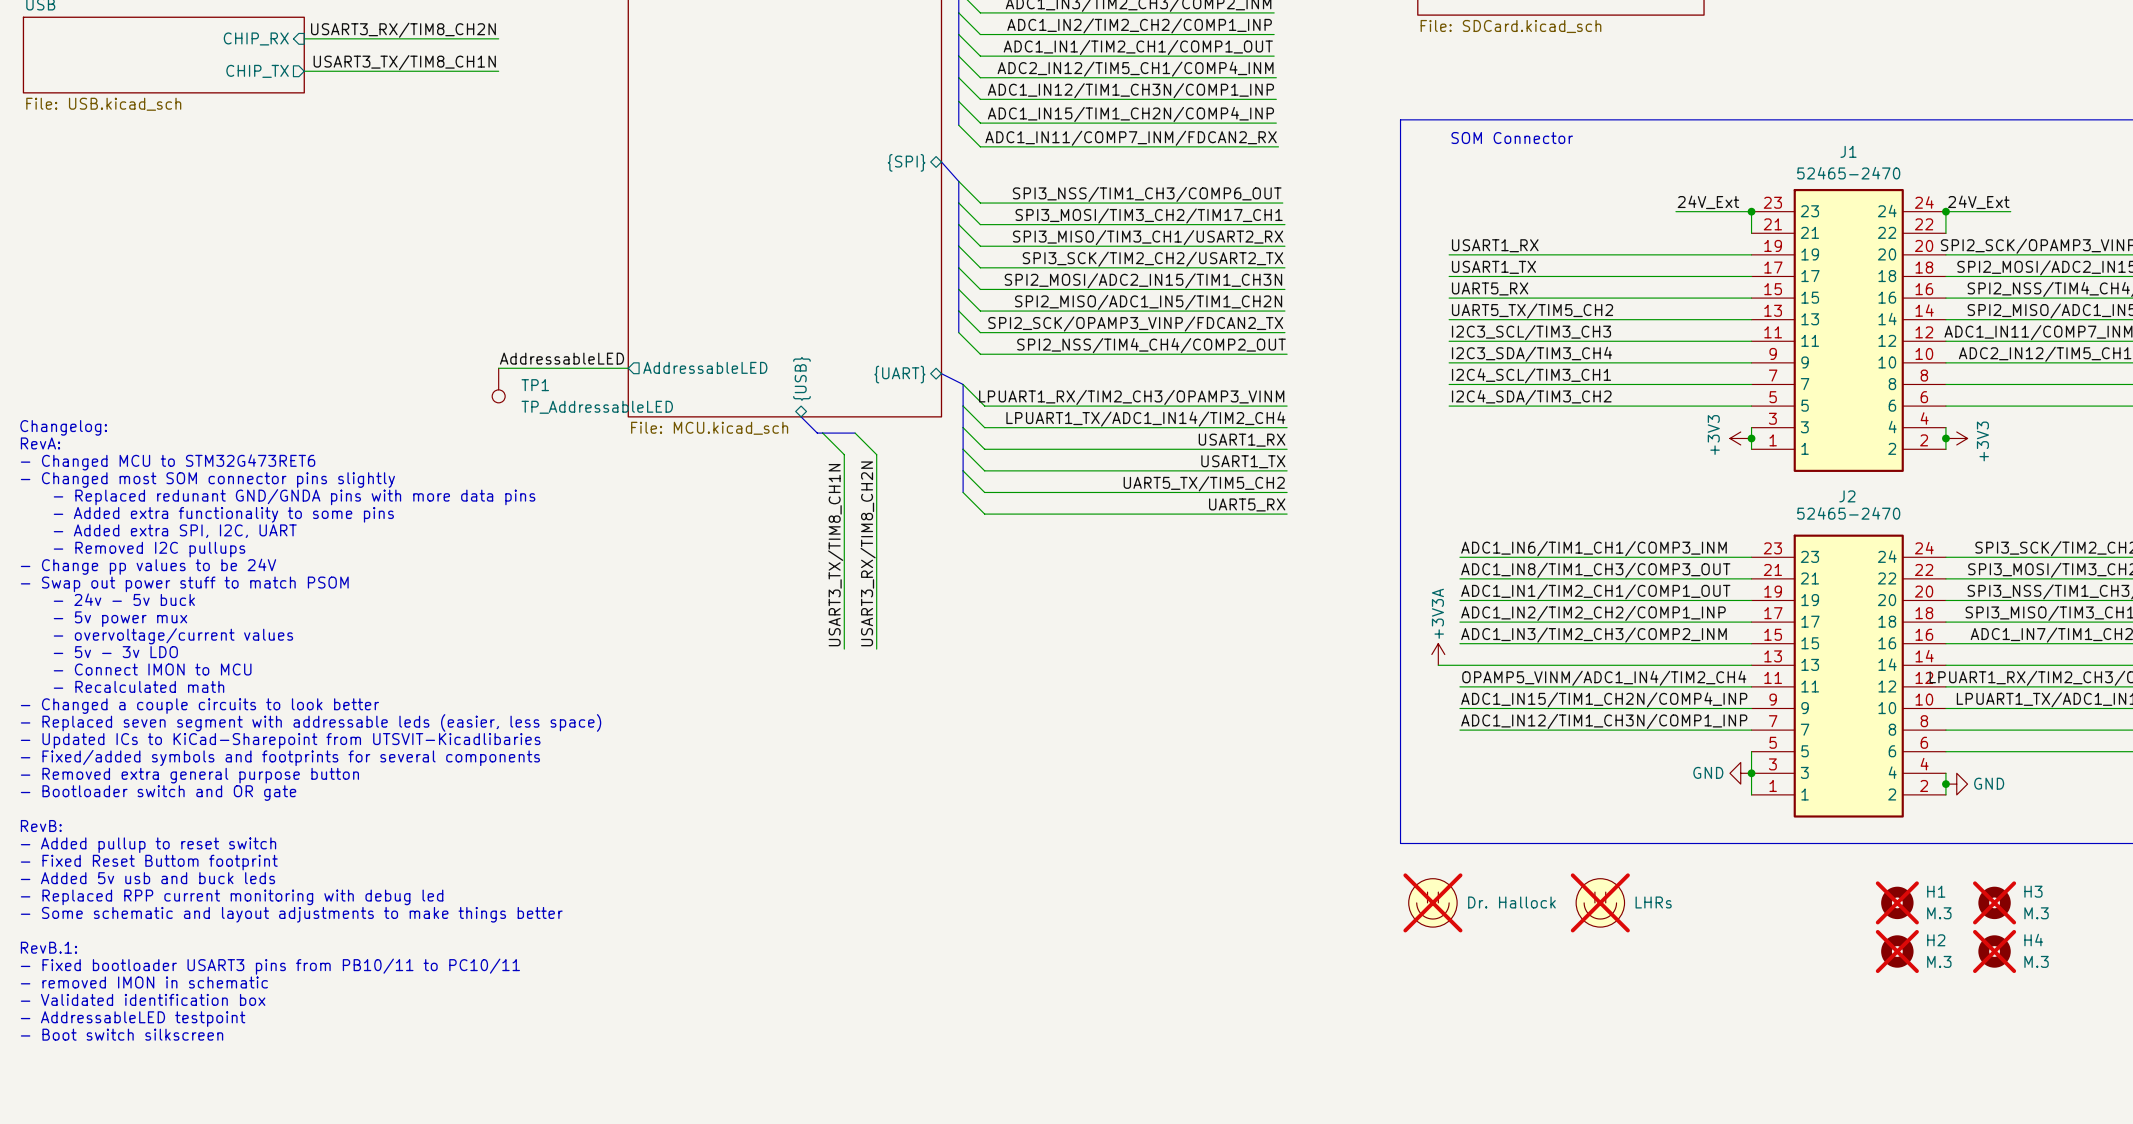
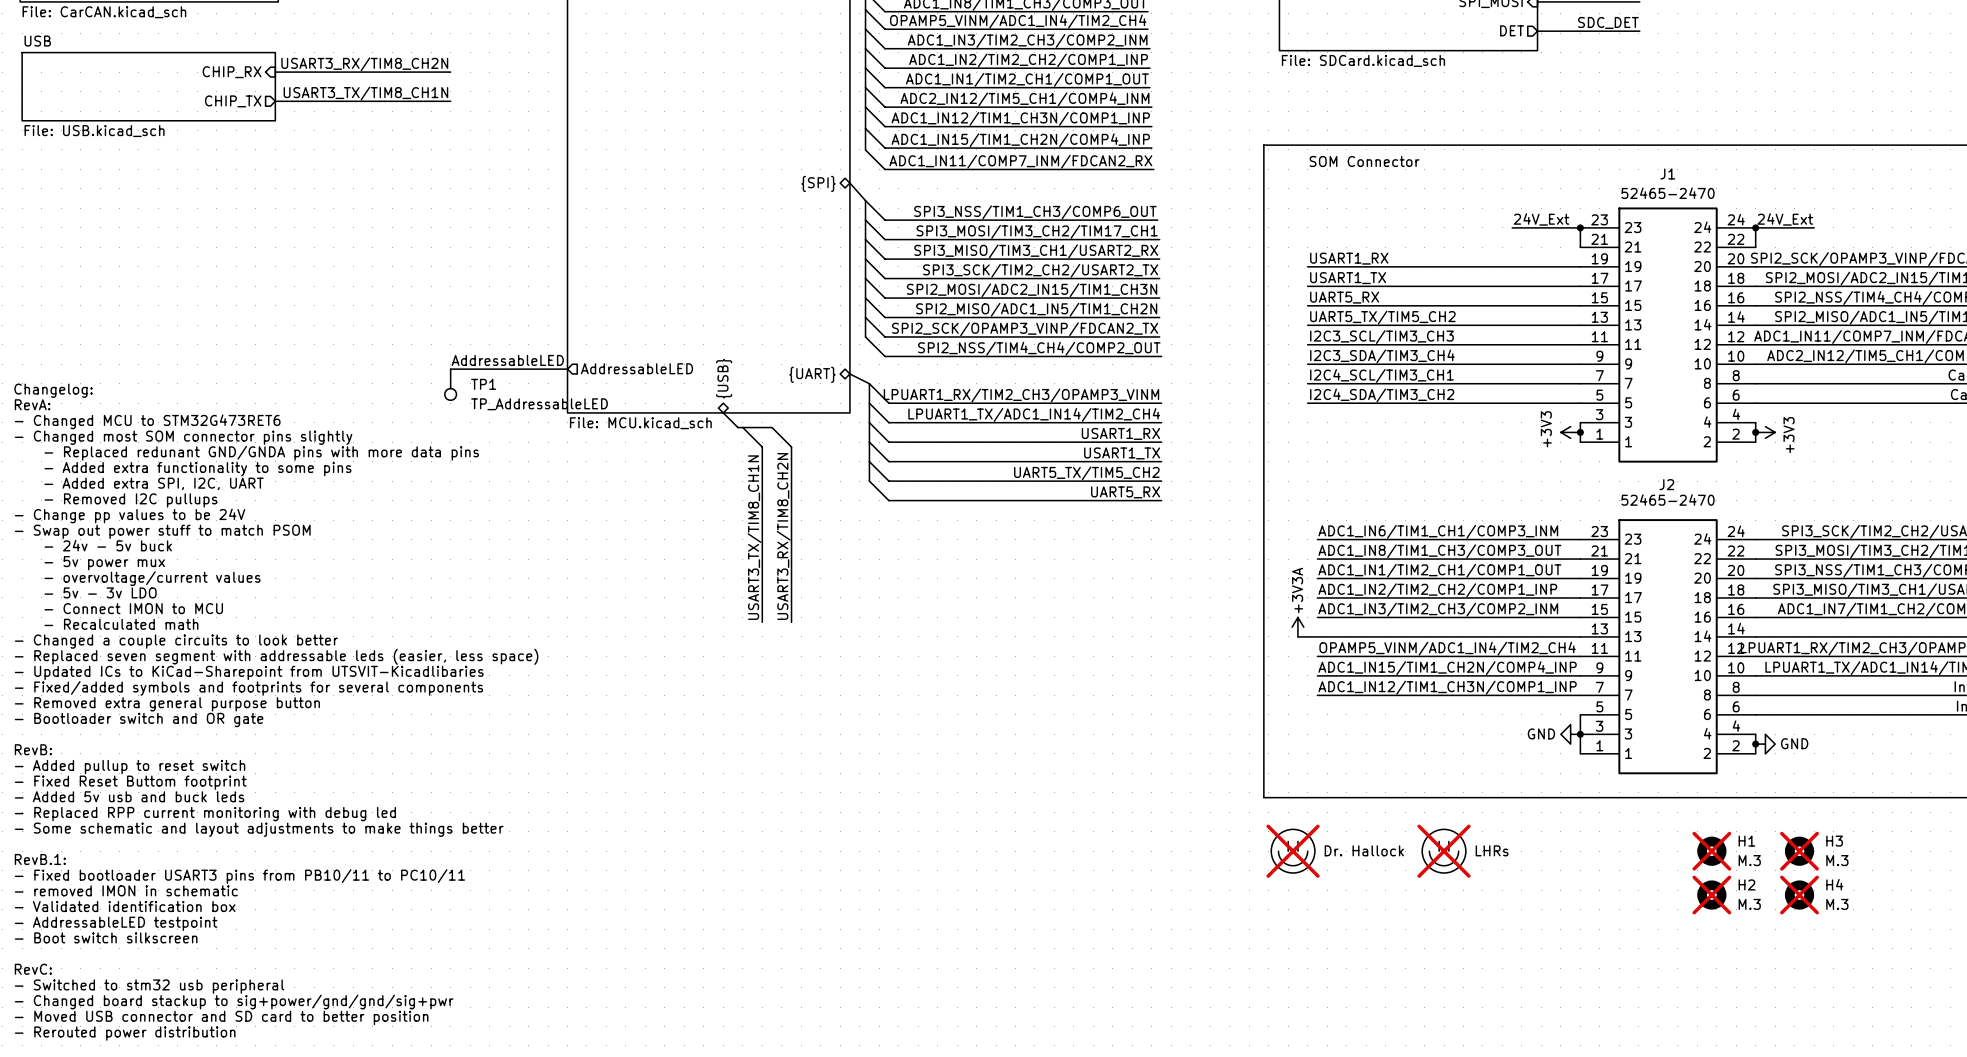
text position: Changelog: (63, 427) -> Changelog: (53, 390)
text position: RevA: (40, 443) -> RevA: (32, 404)
text position: - Changed MCU to STM32G473RET6 (168, 462) -> - Changed MCU to STM32G473RET6 (147, 421)
text position: - Changed most SOM connector pins slightly (207, 480) -> - Changed most SOM connector pins slightly (183, 437)
text position: - Replaced redunant GND/GNDA pins with more data pins (294, 497) -> - Replaced redunant GND/GNDA pins with more data pins (261, 453)
text position: - Added extra functionality to some pins (223, 514) -> - Added extra functionality to some pins (197, 469)
text position: - Added extra SPI, I2C, UART (175, 531) -> - Added extra SPI, I2C, UART (154, 483)
text position: - Removed I2C pullups (149, 549) -> - Removed I2C pullups (130, 500)
text position: - Change pp values to be 24V (148, 566) -> - Change pp values to be 24V (130, 515)
text position: - Swap out power stuff to match PSOM (184, 584) -> - Swap out power stuff to match PSOM (162, 531)
text position: - 24v - 5v buck (124, 599) -> - 24v - 5v buck (108, 545)
text position: - 5v power mux (120, 619) -> - 5v power mux (104, 563)
text position: - overvoltage/current values (173, 636) -> - overvoltage/current values (152, 578)
text position: - 5v - 3v LDO (115, 652) -> - 5v - 3v LDO (100, 592)
text position: - Connect IMON to MCU (152, 669) -> - Connect IMON to MCU (133, 608)
text position: - Recalculated math (138, 686) -> - Recalculated math (121, 624)
text position: - Changed a couple circuits to look better (199, 706) -> - Changed a couple circuits to look better (176, 641)
text position: - Replaced seven segment with addressable leds (easier, less space) (311, 722) -> - Replaced seven segment with addressable leds (easier, less space) (276, 656)
text position: - Updated ICs to KiCad-Sharepoint from UTSVIT-Kicadlibaries (280, 740) -> - Updated ICs to KiCad-Sharepoint from UTSVIT-Kicadlibaries (249, 672)
text position: - Fixed/added symbols and footprints for several components (280, 757) -> - Fixed/added symbols and footprints for several components (248, 688)
text position: - Removed extra general purpose button (189, 775) -> - Removed extra general purpose button (167, 704)
text position: - Bootloader switch and OR gate (158, 793) -> - Bootloader switch and OR gate (139, 719)
text position: RevB: (41, 826) -> RevB: (33, 749)
text position: - Added pullup to reset switch (148, 845) -> - Added pullup to reset switch (130, 767)
text position: - Fixed Reset Buttom footprint (149, 862) -> - Fixed Reset Buttom footprint (130, 782)
text position: - Added 5v usb and buck leds (147, 878) -> - Added 5v usb and buck leds (129, 796)
text position: - Replaced RPP current monitoring with debug led (232, 897) -> - Replaced RPP current monitoring with debug led (205, 814)
text position: - Some schematic and layout adjustments to make things better (291, 914) -> - Some schematic and layout adjustments to make things better (259, 829)
text position: RevB.1: (48, 947) -> RevB.1: (40, 859)
text position: - Fixed bootloader USART3 pins from PB10/11 to PC10/11 (270, 966) -> - Fixed bootloader USART3 pins from PB10/11 to PC10/11 (239, 876)
text position: - removed IMON in schematic (144, 982) -> - removed IMON in schematic (126, 890)
text position: - Validated identification box (143, 999) -> - Validated identification box (125, 906)
text position: - AddressableLED testpoint (133, 1019) -> - AddressableLED testpoint (116, 923)
text: none -> RevC: (33, 969)
text position: - Boot switch silkscreen (122, 1034) -> - Boot switch silkscreen (106, 937)
text: none -> - Switched to stm32 usb peripheral (149, 986)
text: none -> - Changed board stackup to sig+power/gnd/gnd/sig+pwr (234, 1002)
text: none -> - Moved USB connector and SD card to better position (221, 1017)
text: none -> - Rerouted power distribution (125, 1033)

